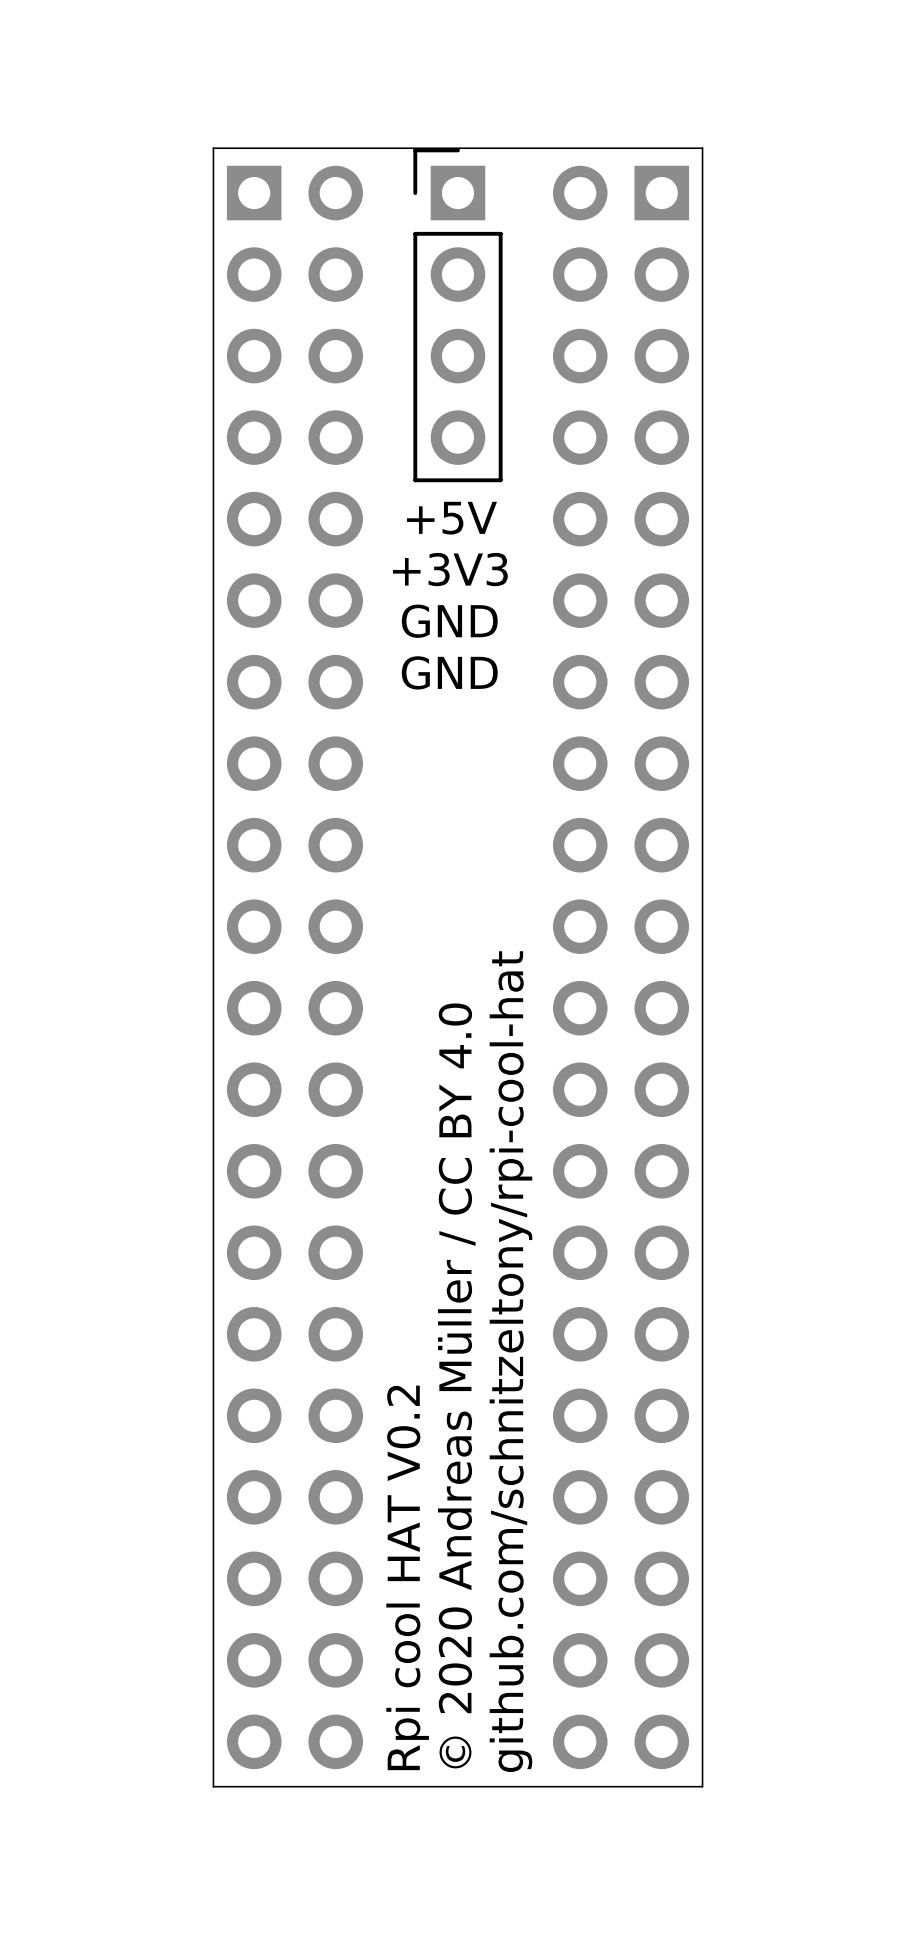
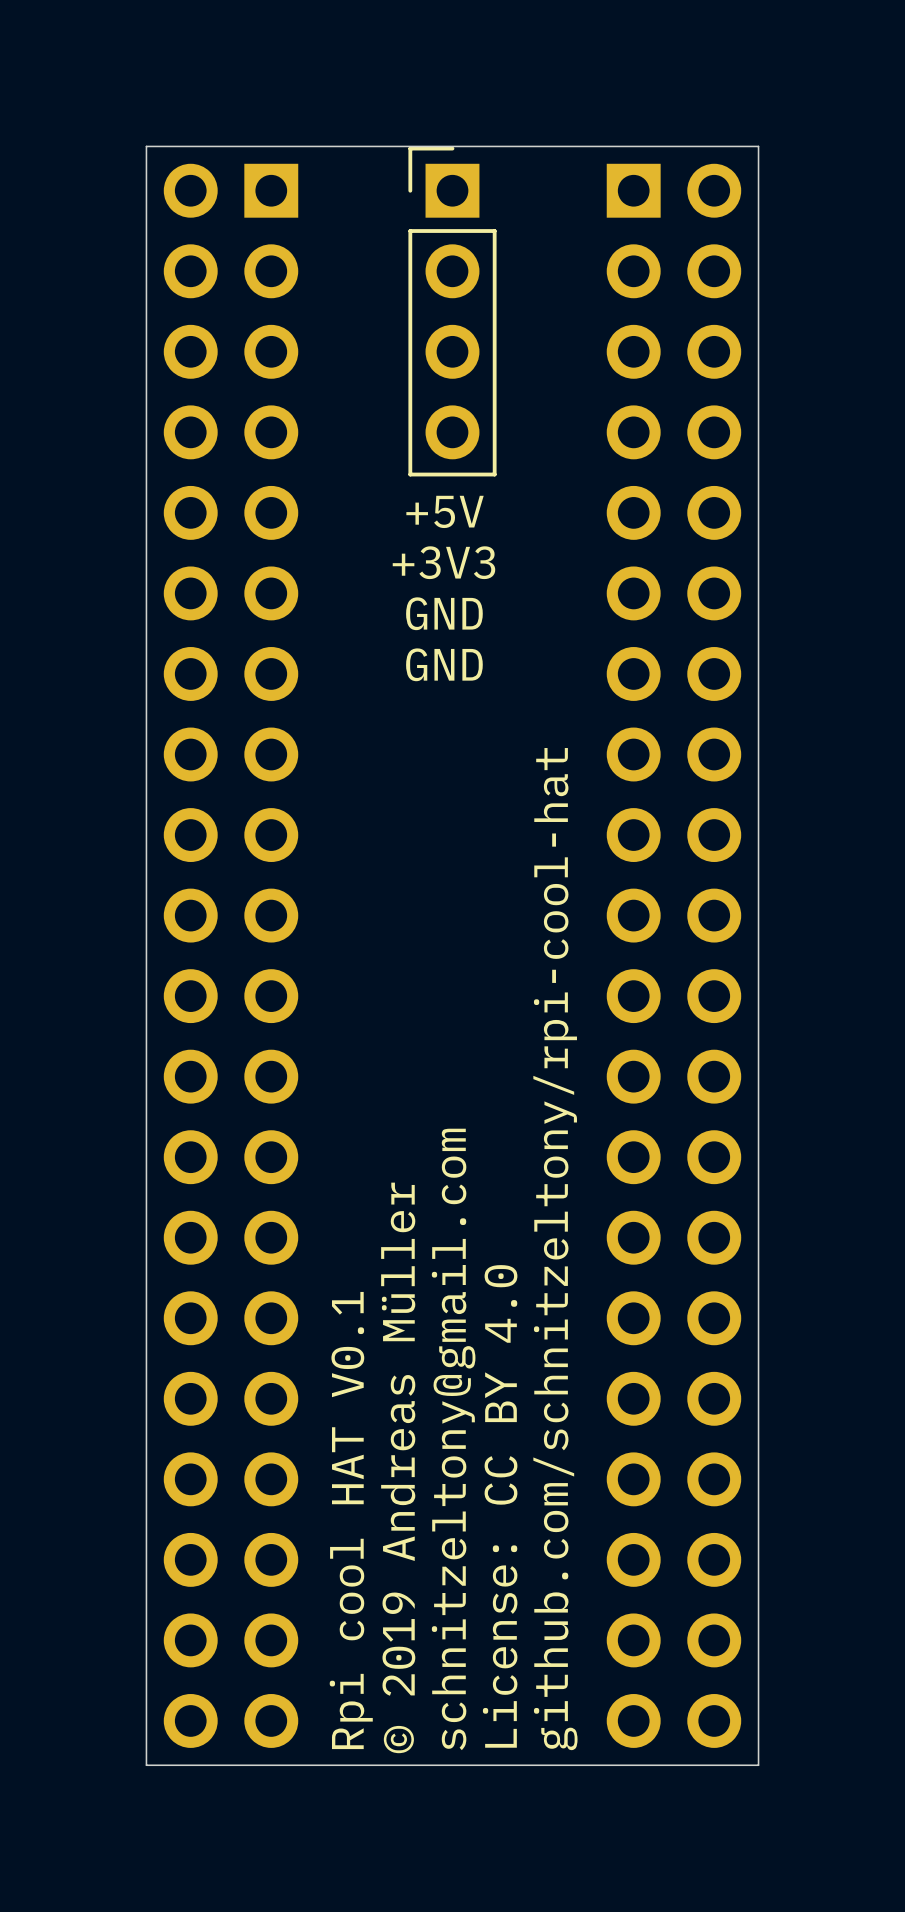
board edge: (213, 148) (213, 1786) -> (210, 146) (146, 146) (146, 1765) (210, 1765)
board edge: (702, 148) (702, 1786) -> (694, 146) (758, 146) (758, 1765) (694, 1765)
part position: (294, 967) -> (673, 955)
part position: (621, 967) -> (231, 955)
text: github.com/schnitzeltony/rpi-cool-hat (510, 1361) -> License: CC BY 4.0 (500, 1506)
text: none -> github.com/schnitzeltony/rpi-cool-hat (555, 1249)
text: © 2020 Andreas Müller / CC BY 4.0 (456, 1385) -> schnitzeltony@gmail.com (453, 1439)
text: none -> Rpi cool HAT V0.1 (351, 1520)
text: Rpi cool HAT V0.2 (407, 1577) -> © 2019 Andreas Müller (398, 1467)

